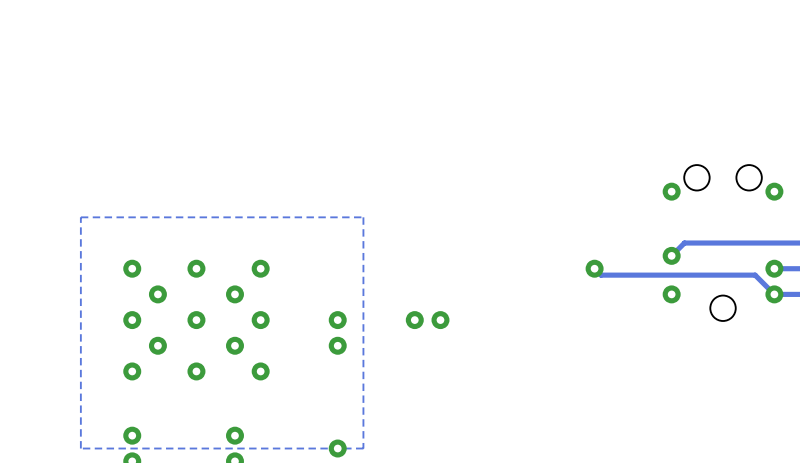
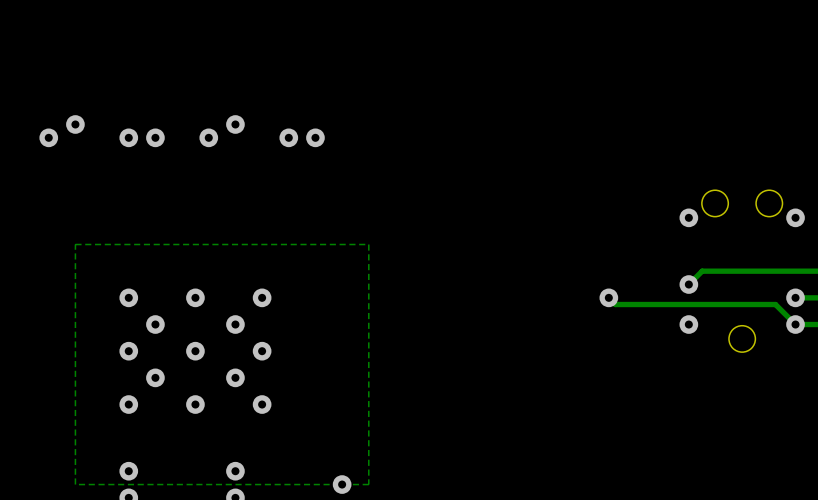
via: none -> (75, 124)
via: none -> (235, 124)
via: none -> (48, 137)
via: none -> (128, 137)
via: none -> (155, 137)
via: none -> (208, 137)
via: none -> (288, 137)
via: none -> (315, 137)
via: (337, 320) -> none
via: (414, 320) -> none
via: (440, 320) -> none
via: (337, 345) -> none

